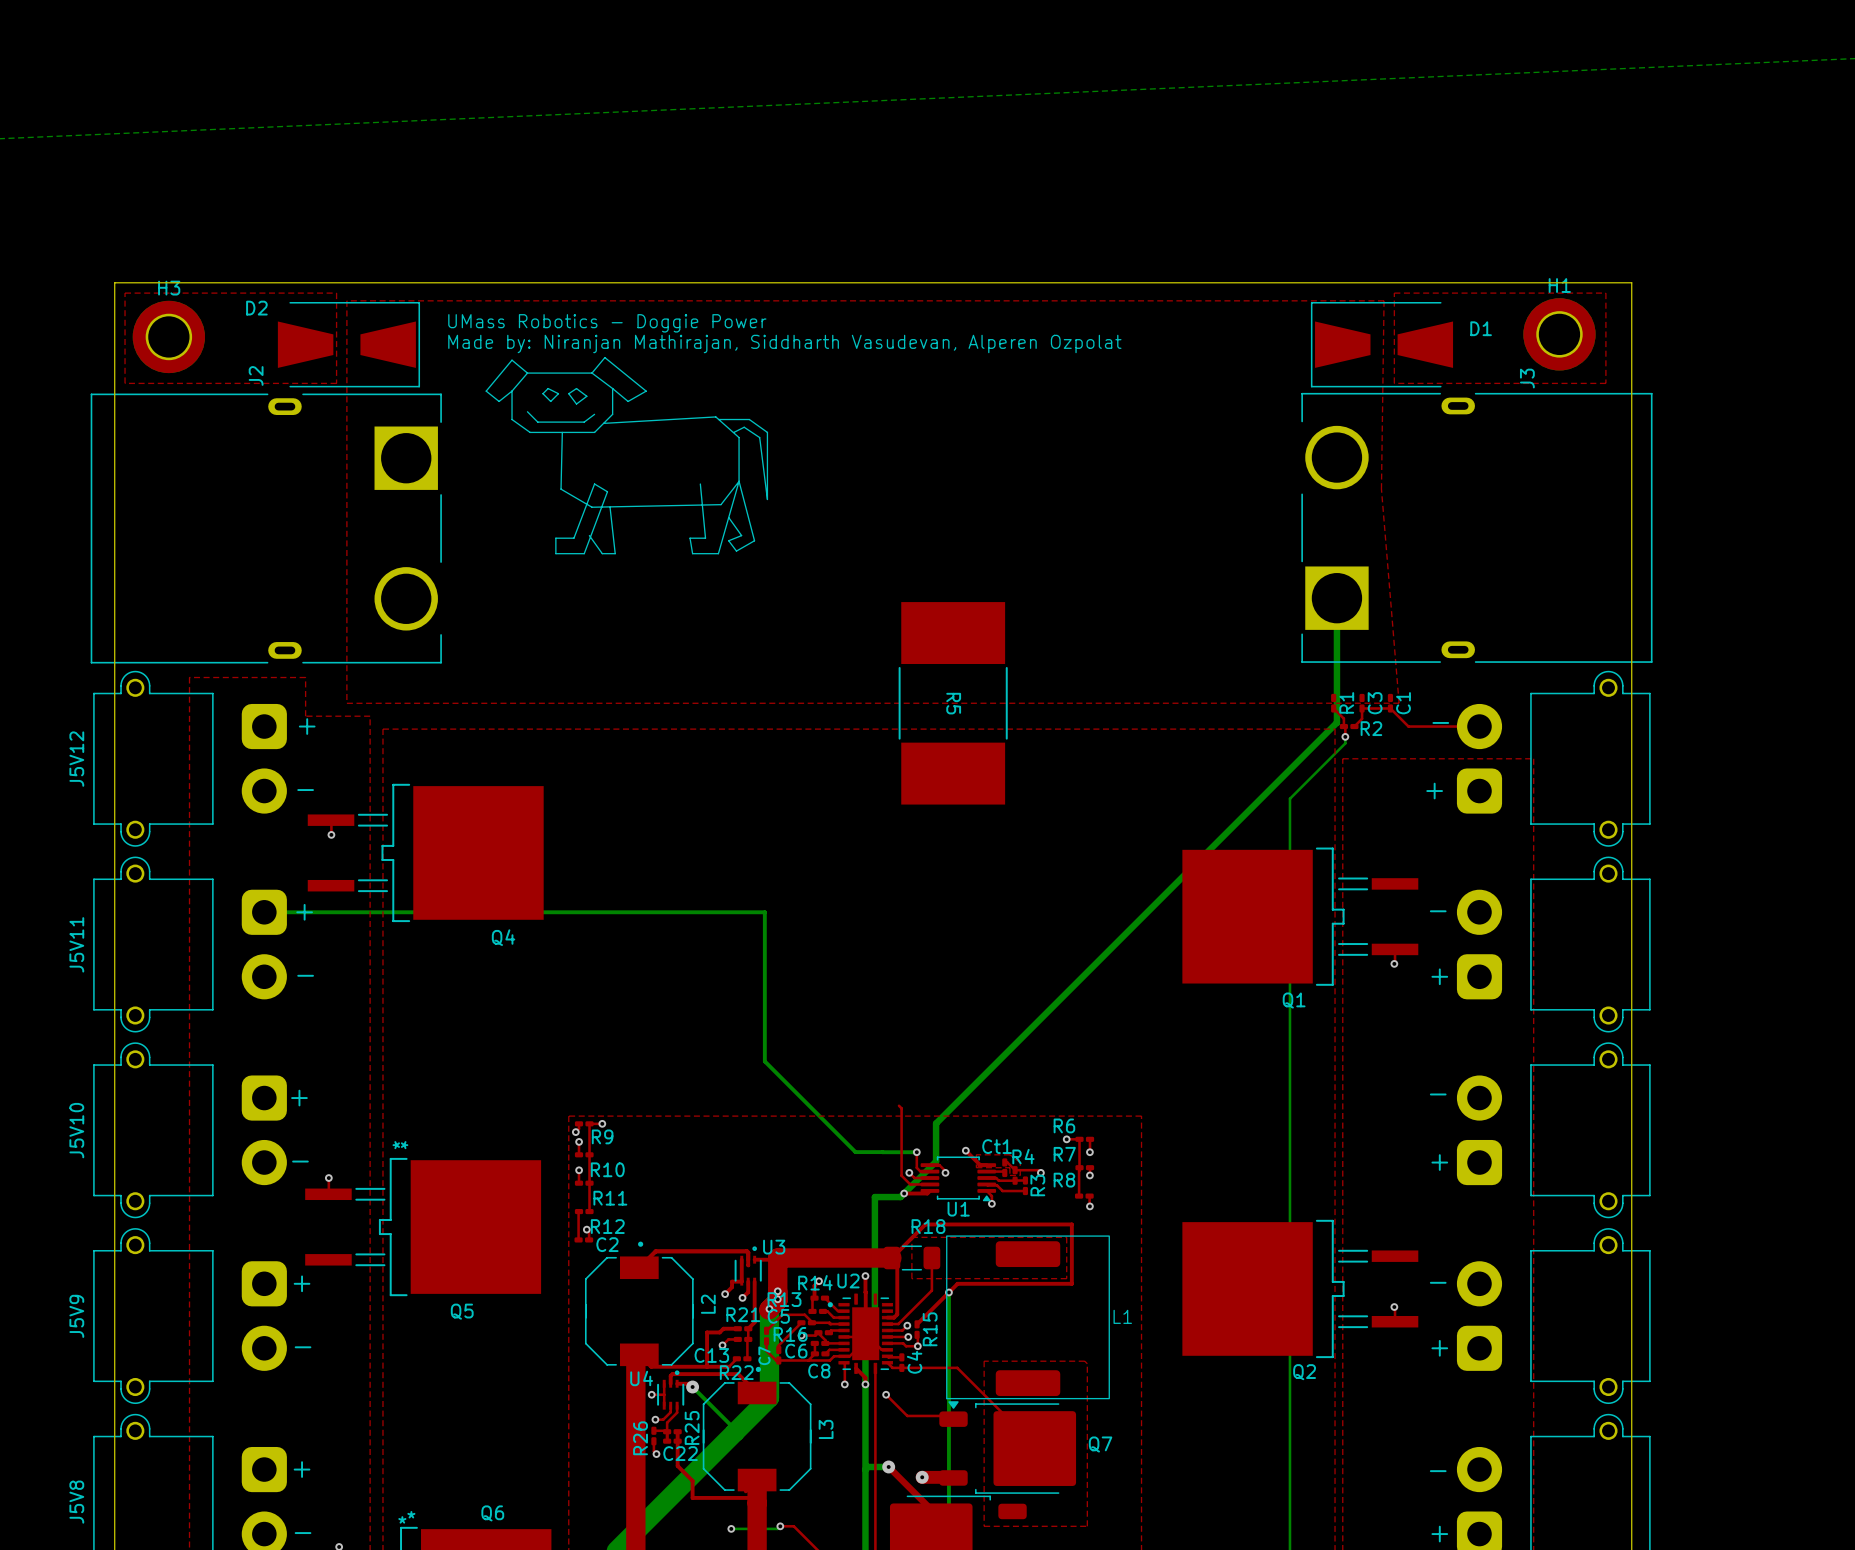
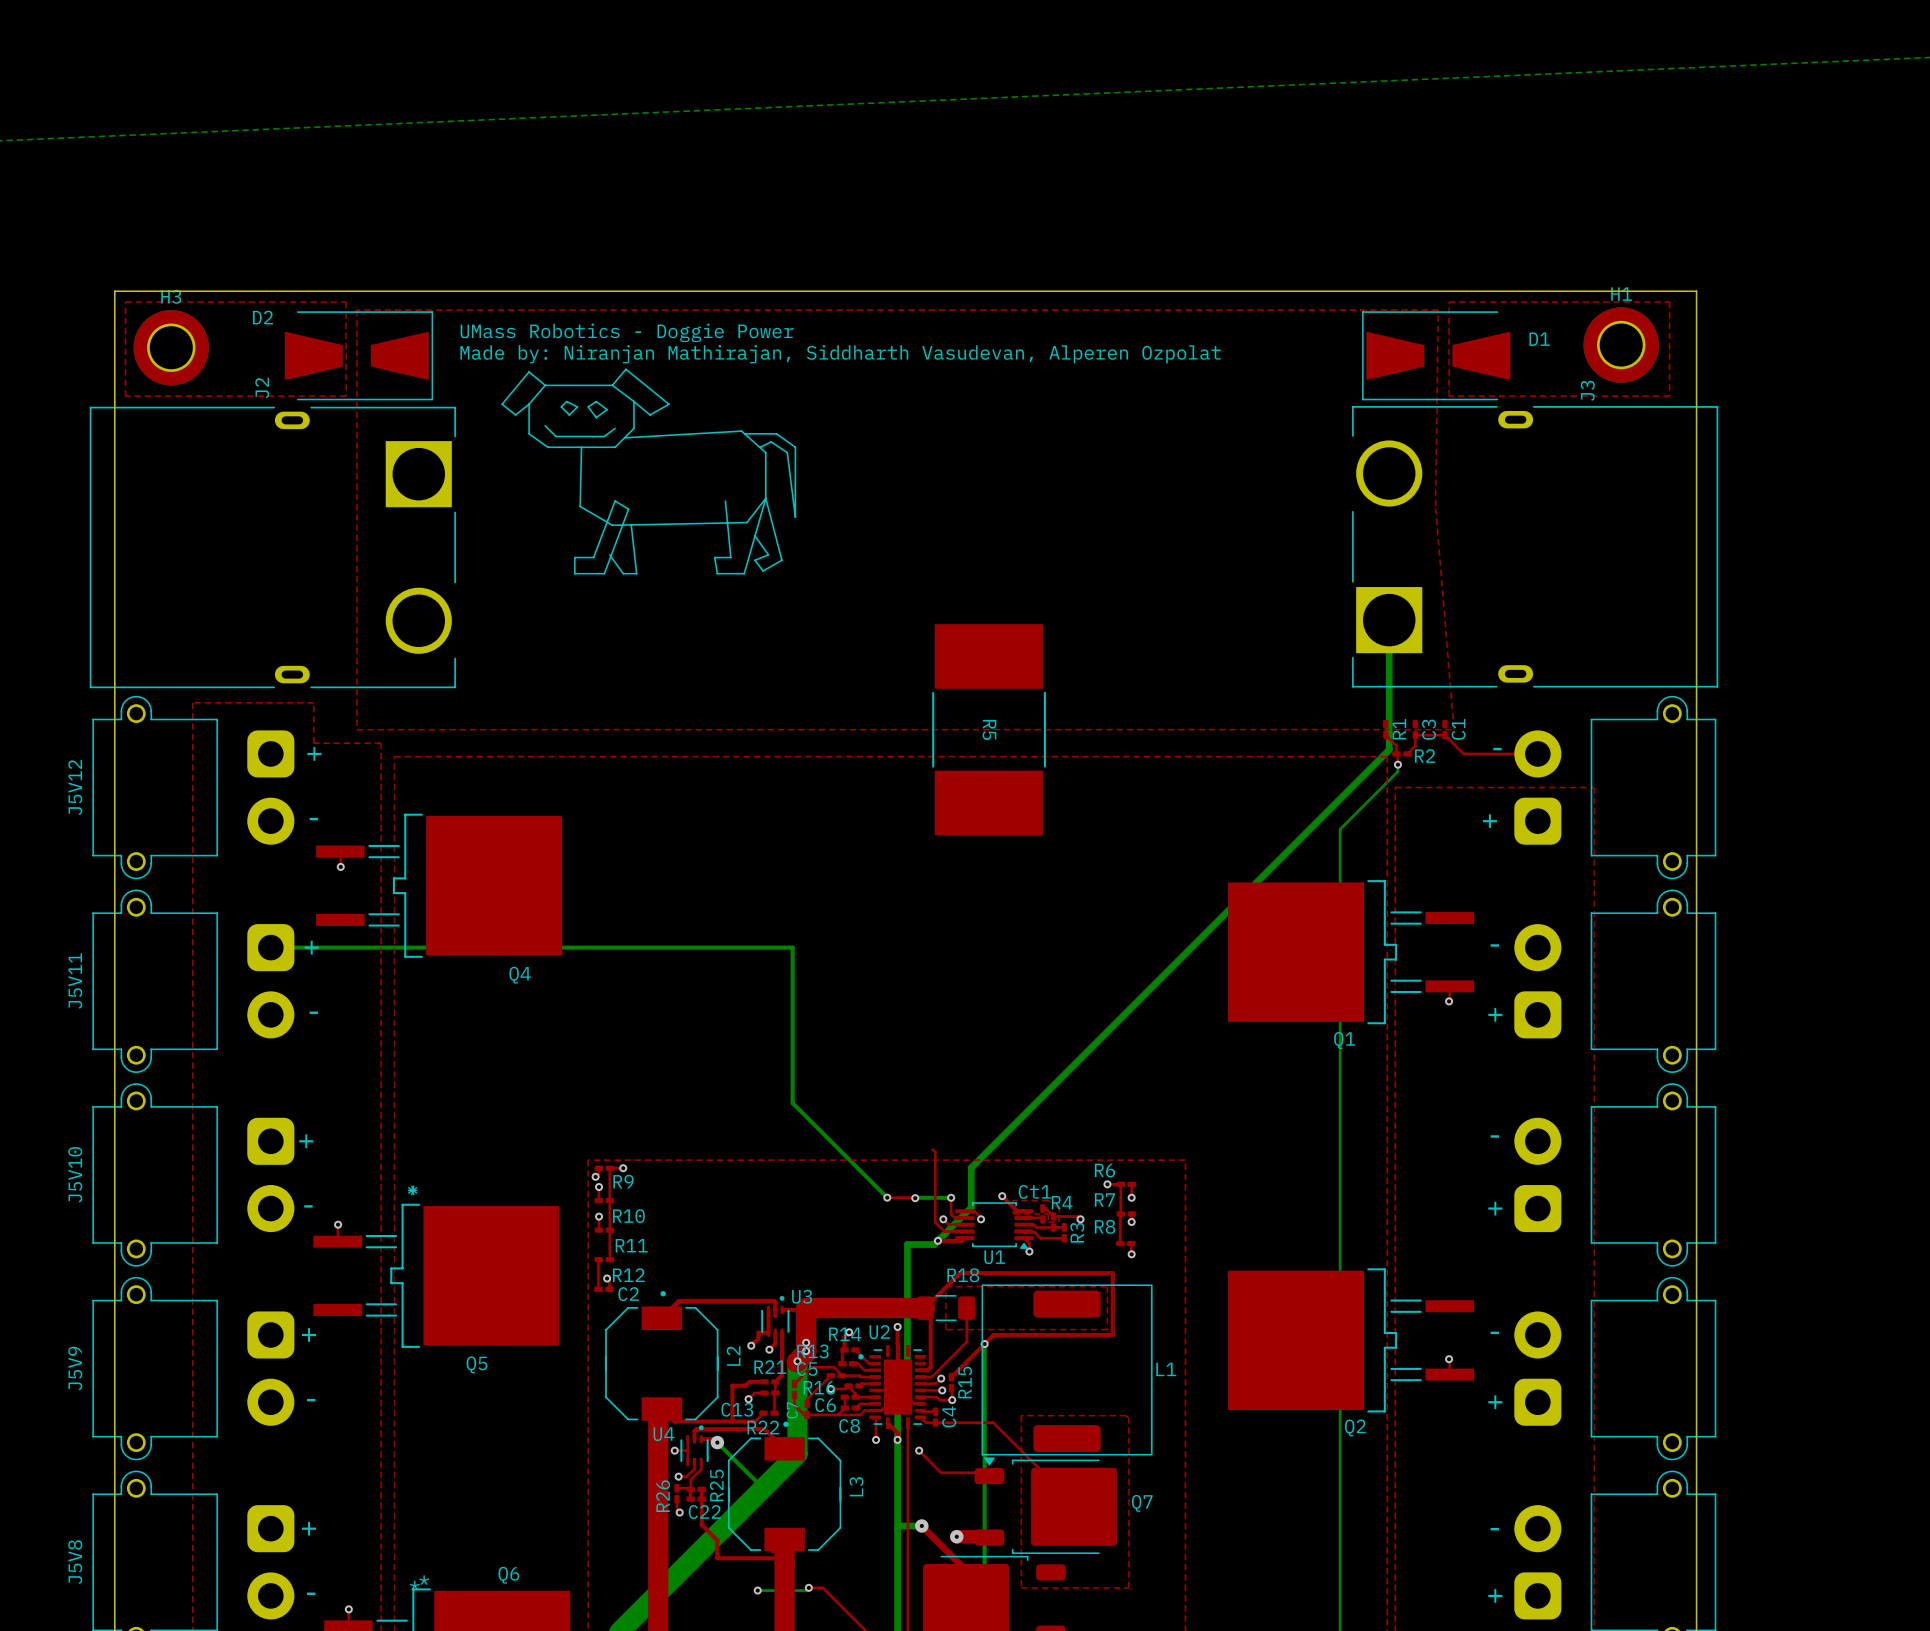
top track: none -> (887, 1197) (915, 1198)
bottom track: (855, 1152) (882, 1152) -> none
via: none -> (887, 1197)
via: none -> (915, 1198)

